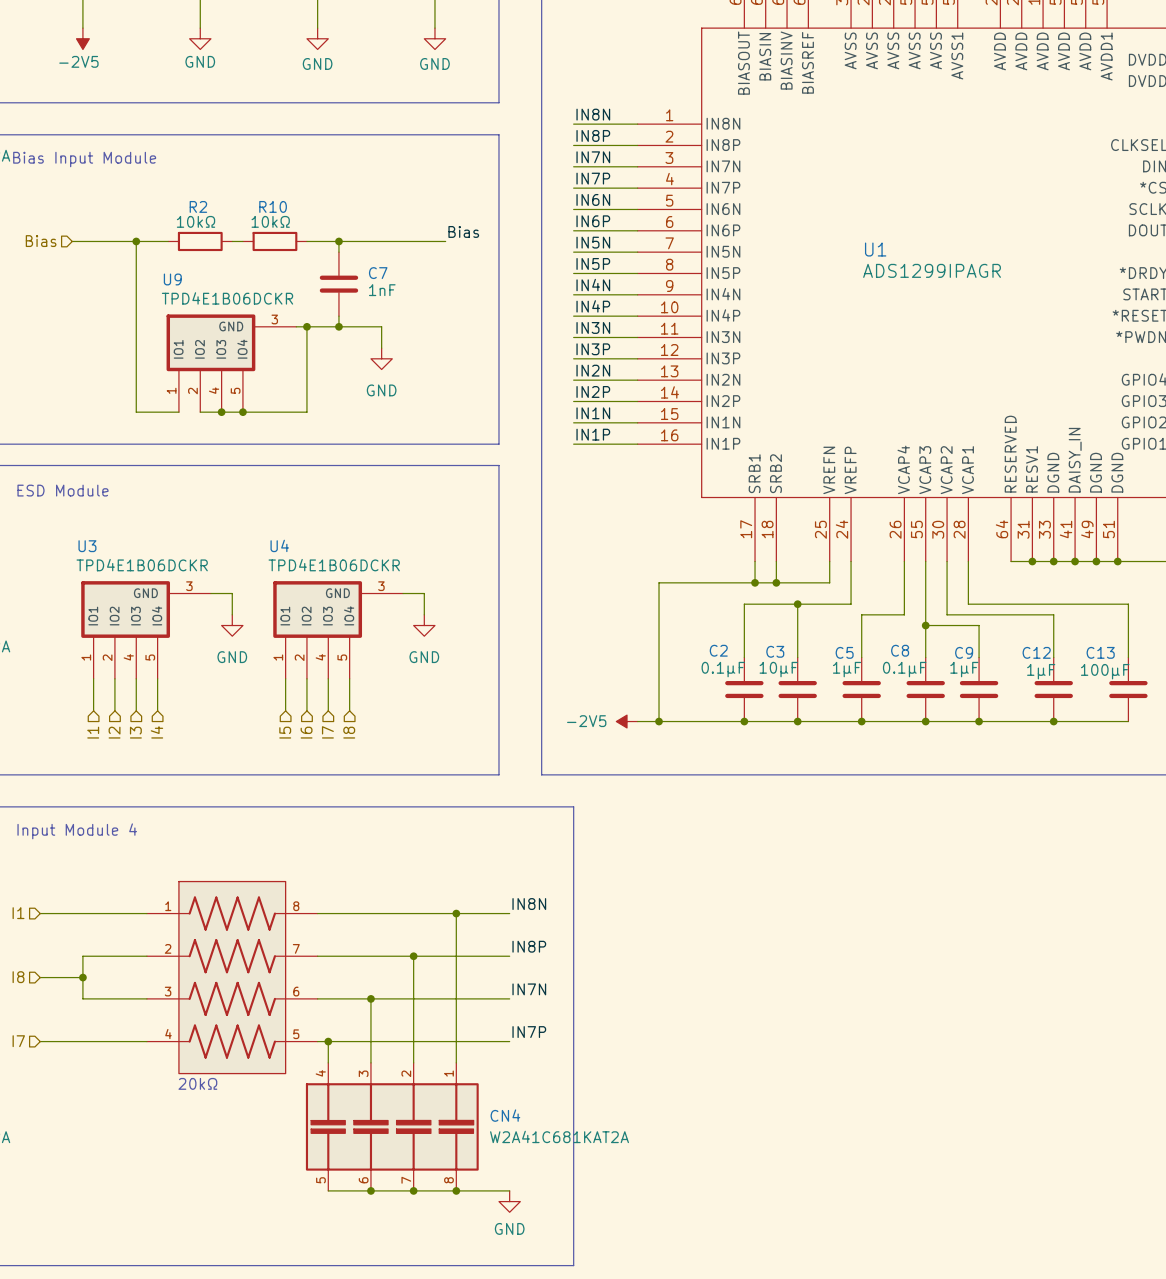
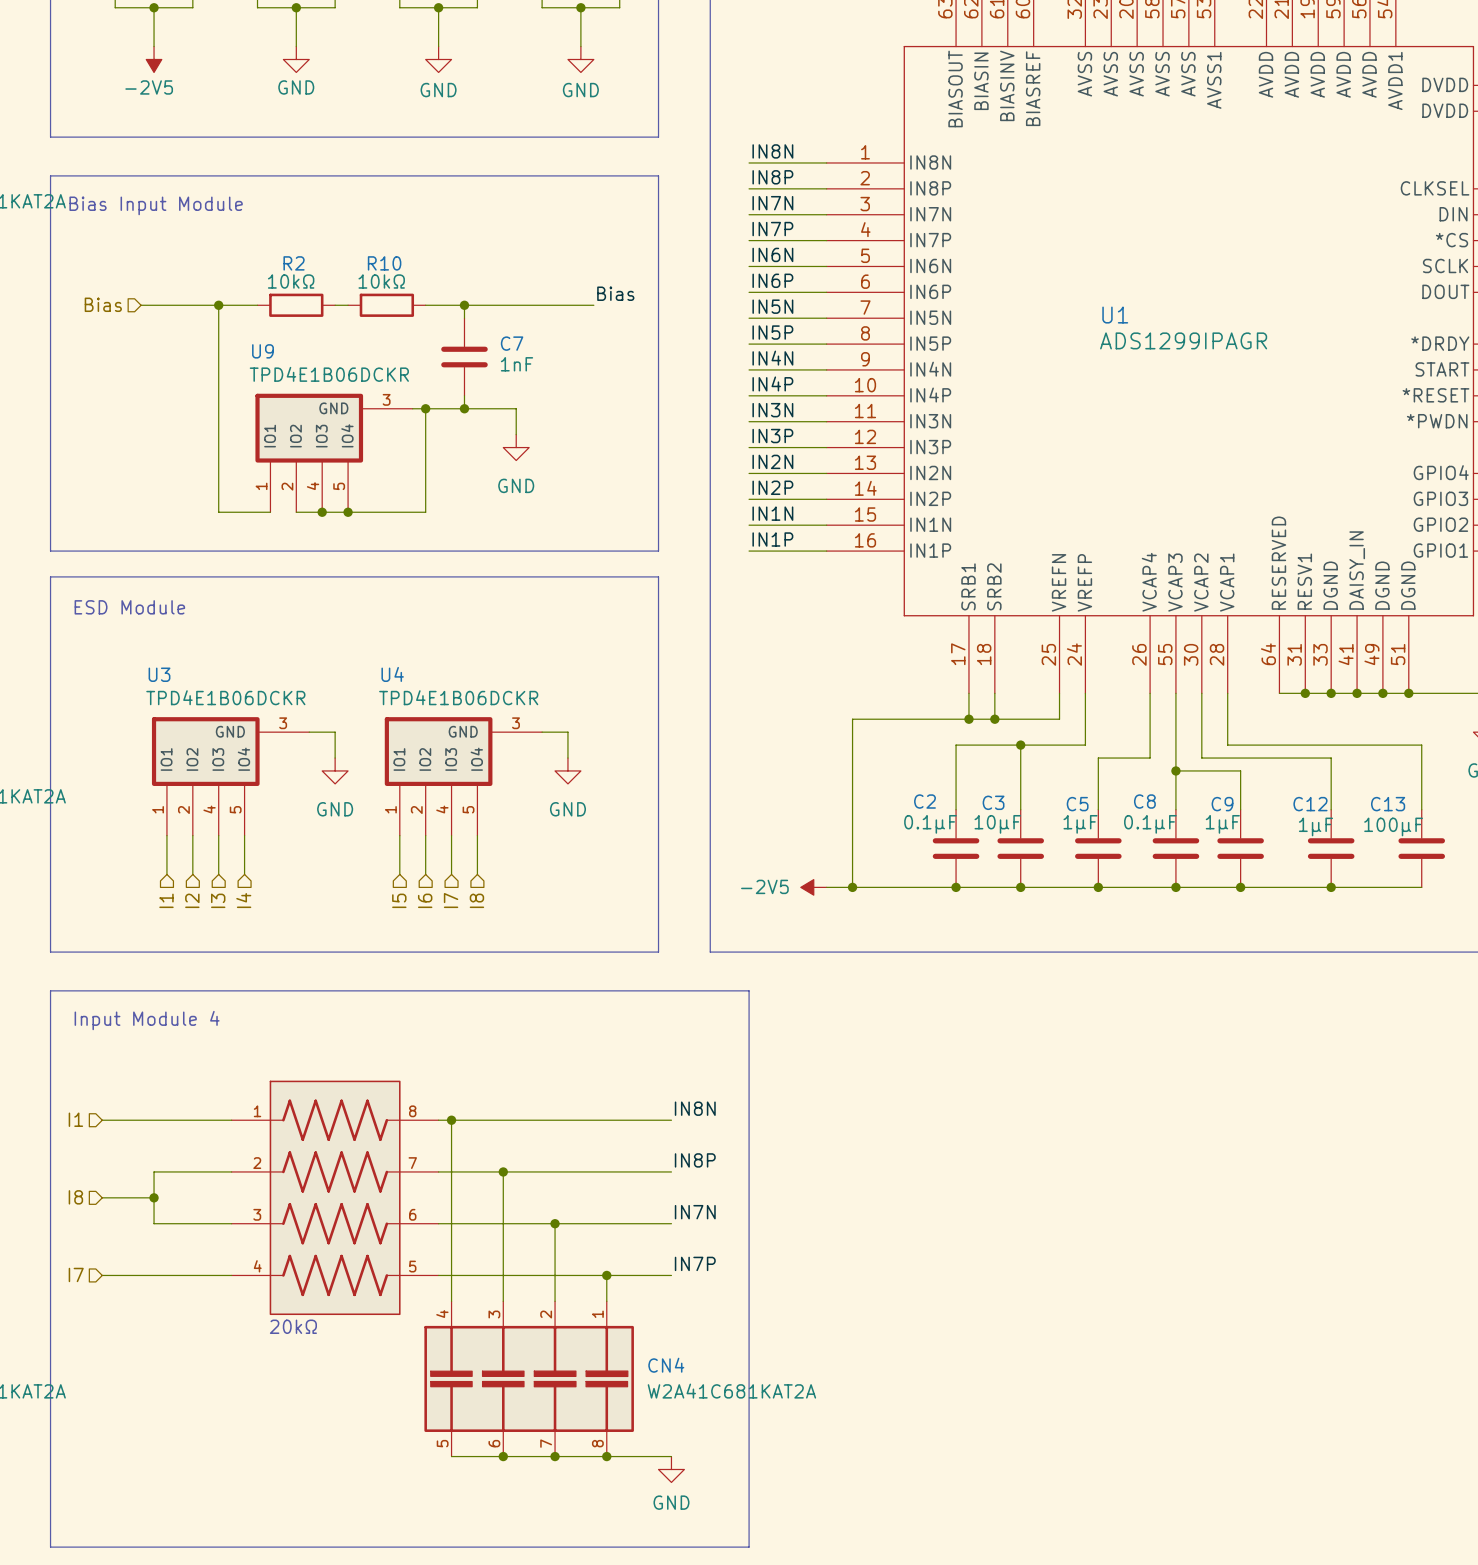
junction: none -> (451, 1120)
wire: (456, 913) (456, 1041) -> (451, 1120) (451, 1275)
junction: (456, 913) -> none
junction: none -> (503, 1171)
wire: (413, 956) (413, 998) -> (503, 1171) (503, 1223)
junction: (413, 956) -> none
junction: (370, 998) -> none
junction: none -> (555, 1223)
junction: (328, 1041) -> none
junction: none -> (606, 1275)

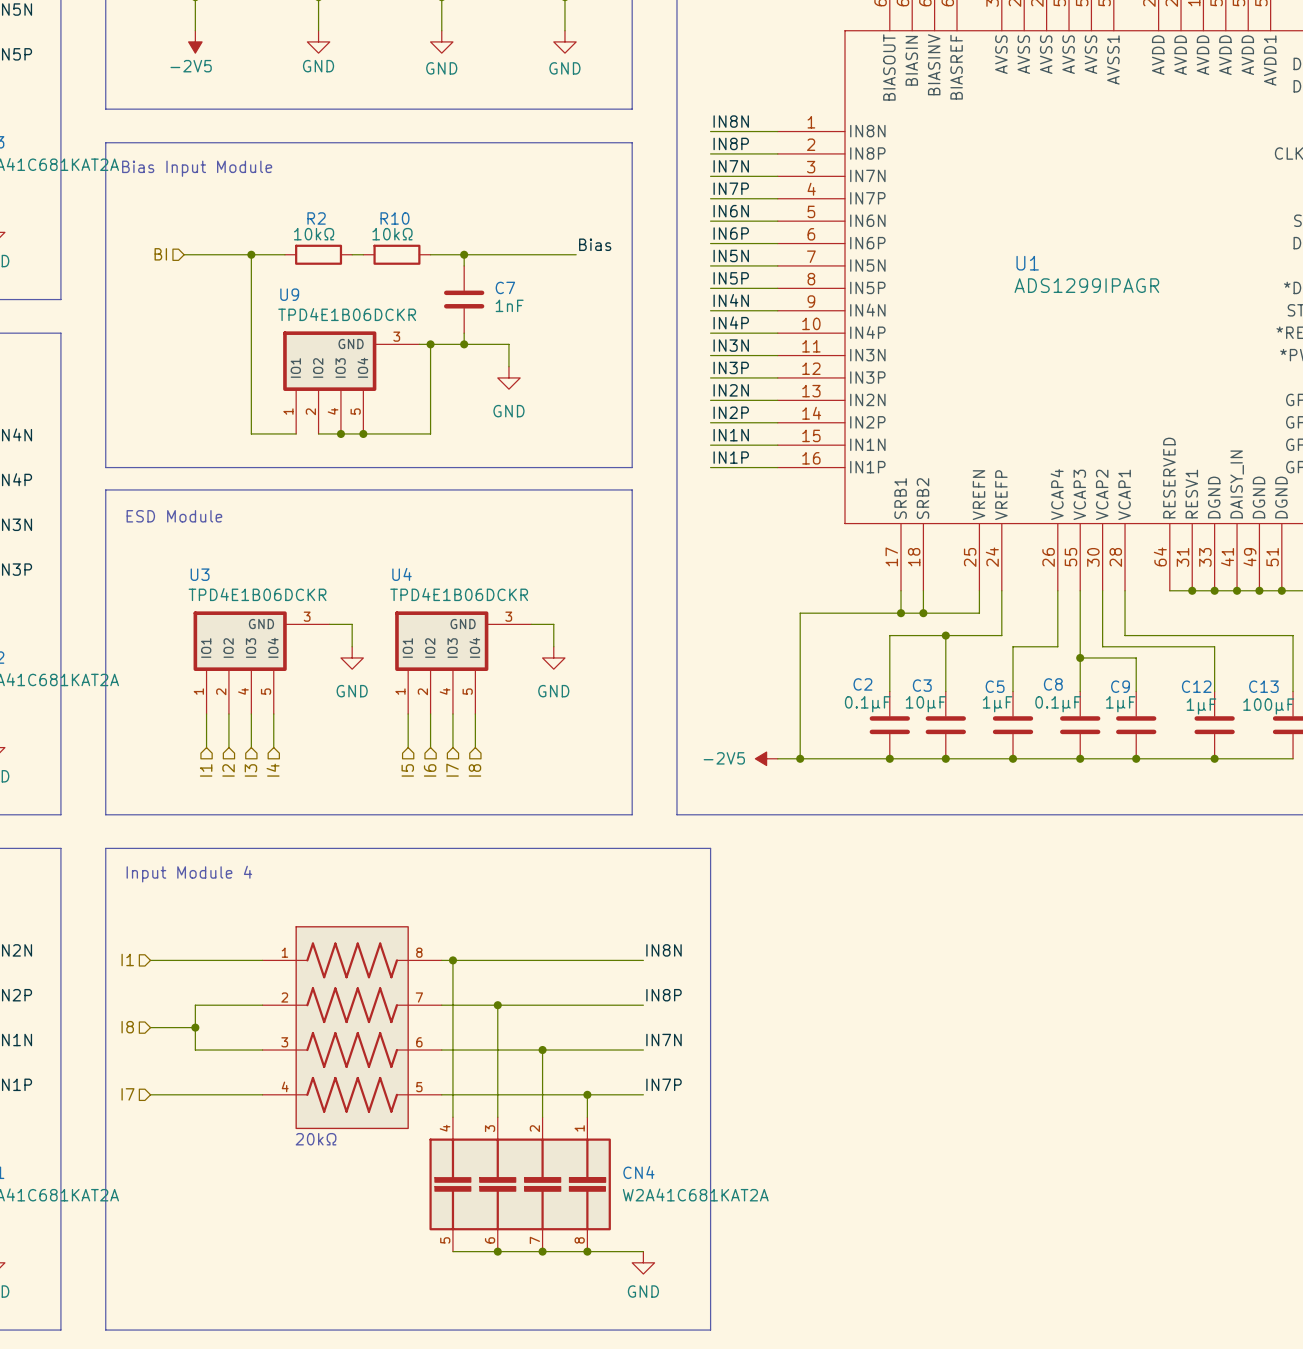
hierarchical label: Bias (103, 304) -> BI (160, 254)

